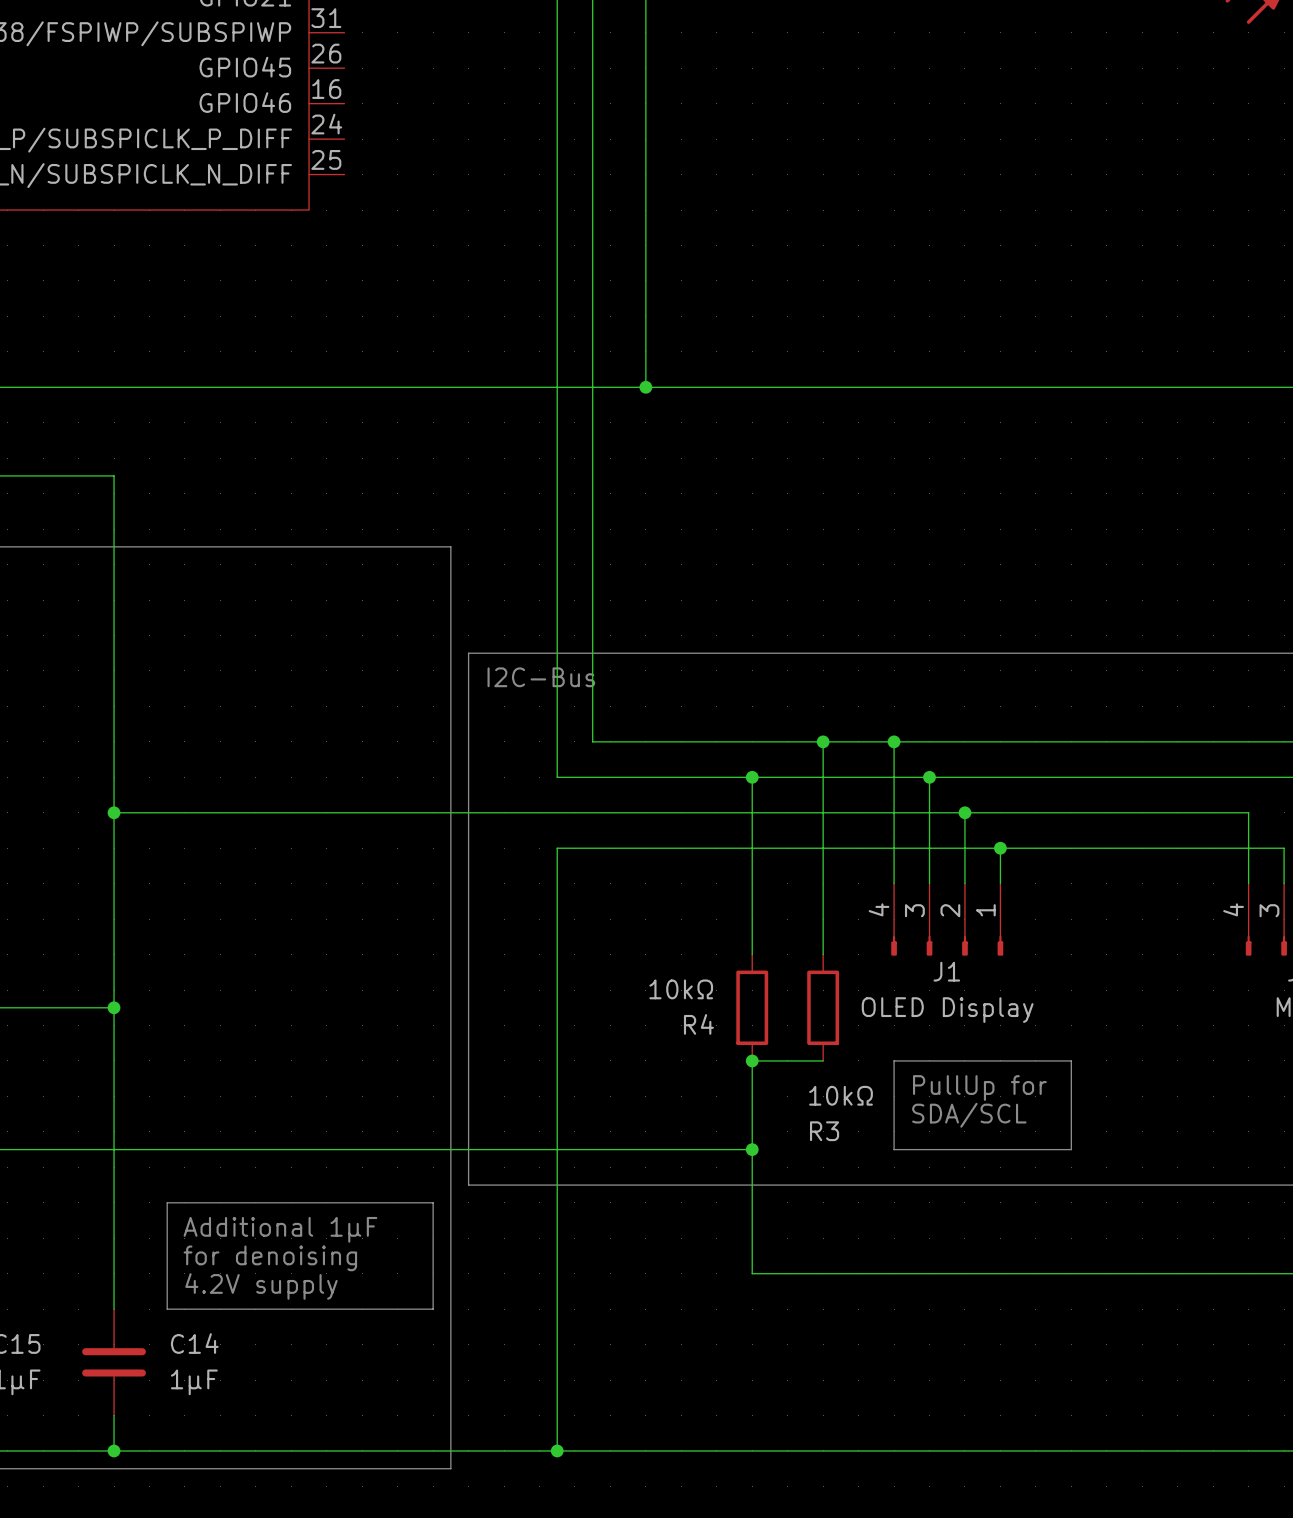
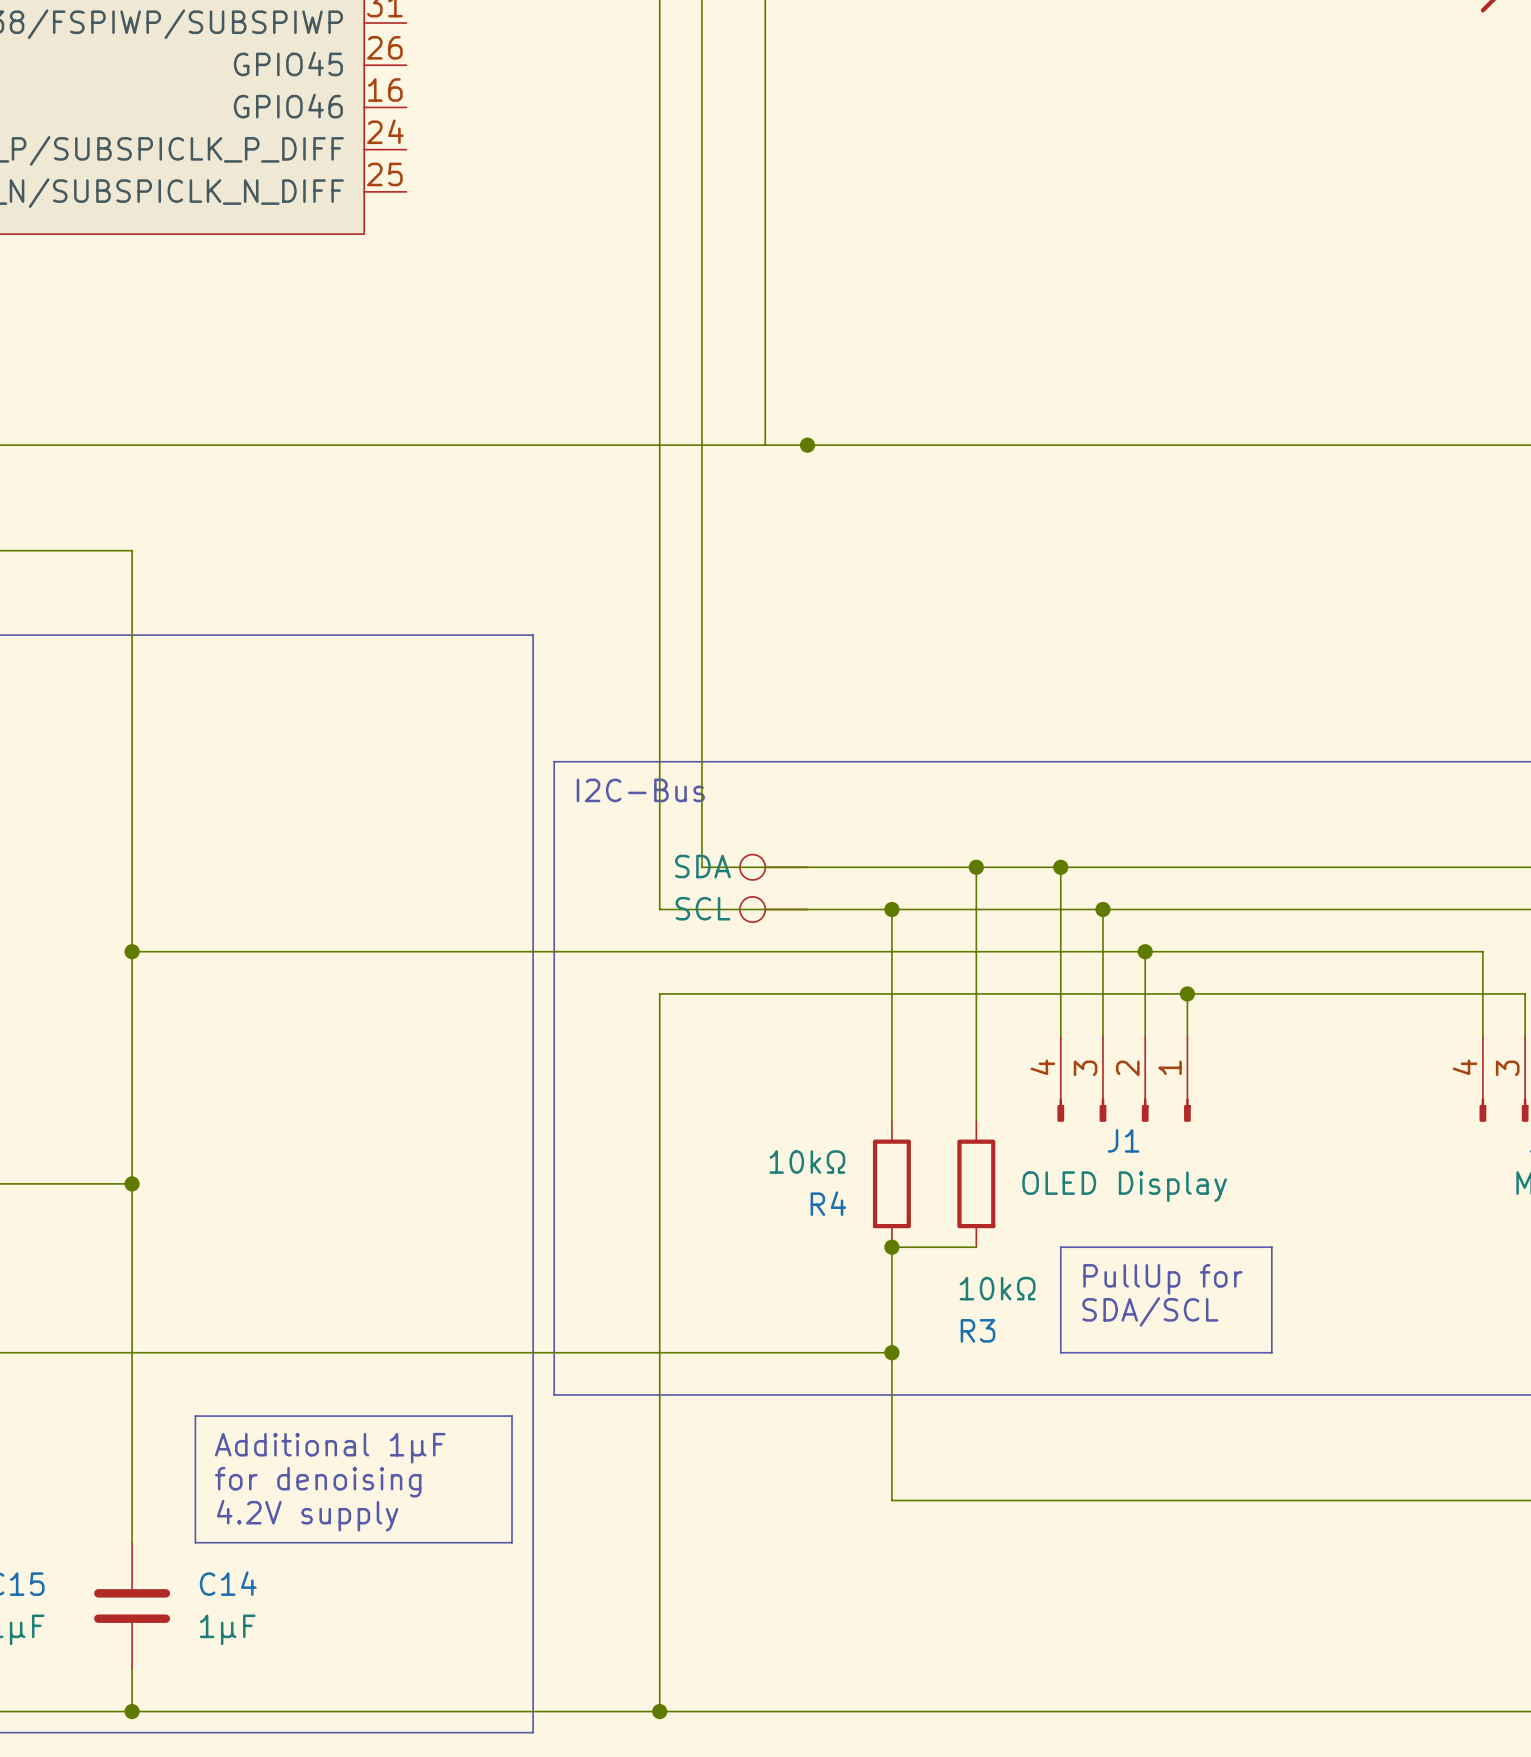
junction position: (645, 387) -> (807, 445)
part: none -> SDA (773, 867)
part: none -> SCL (773, 909)

